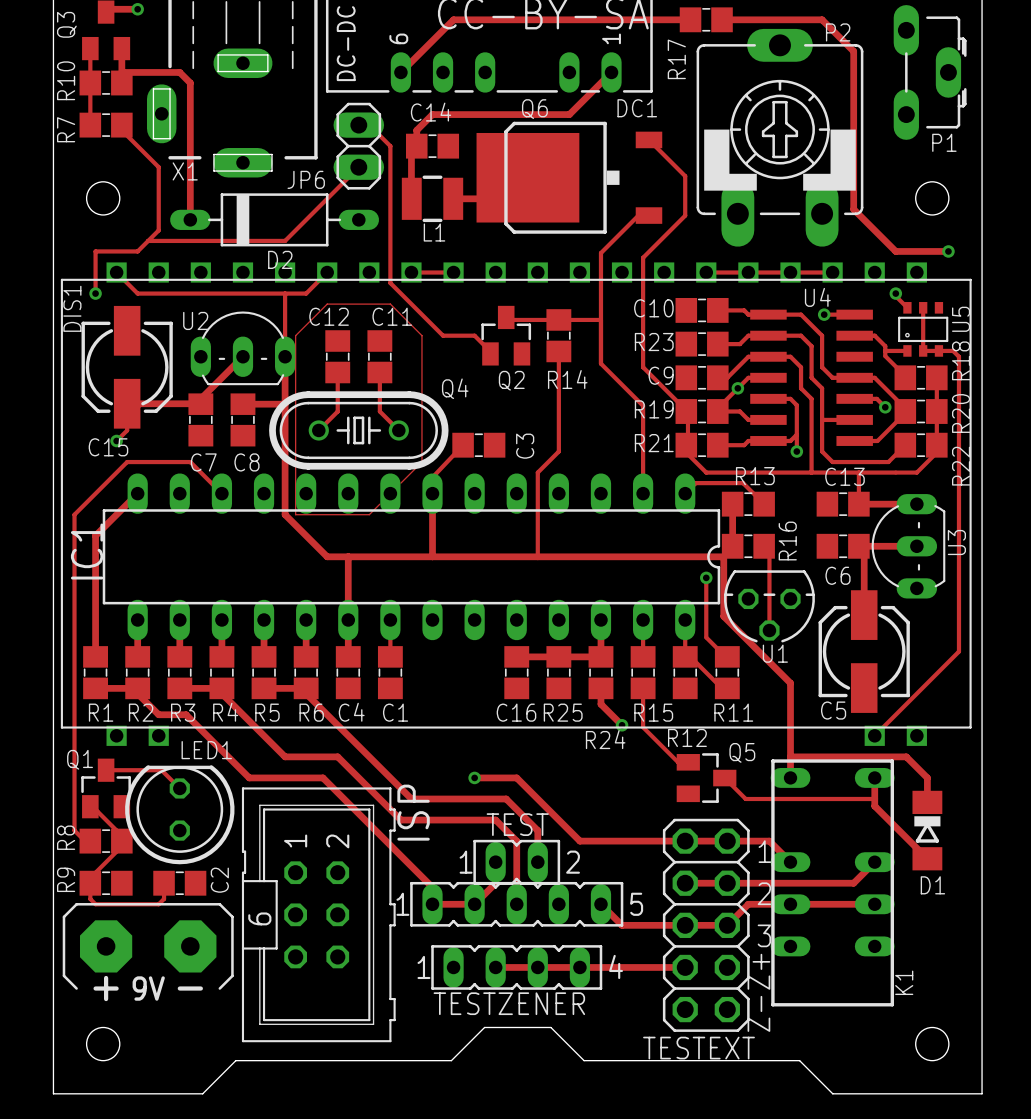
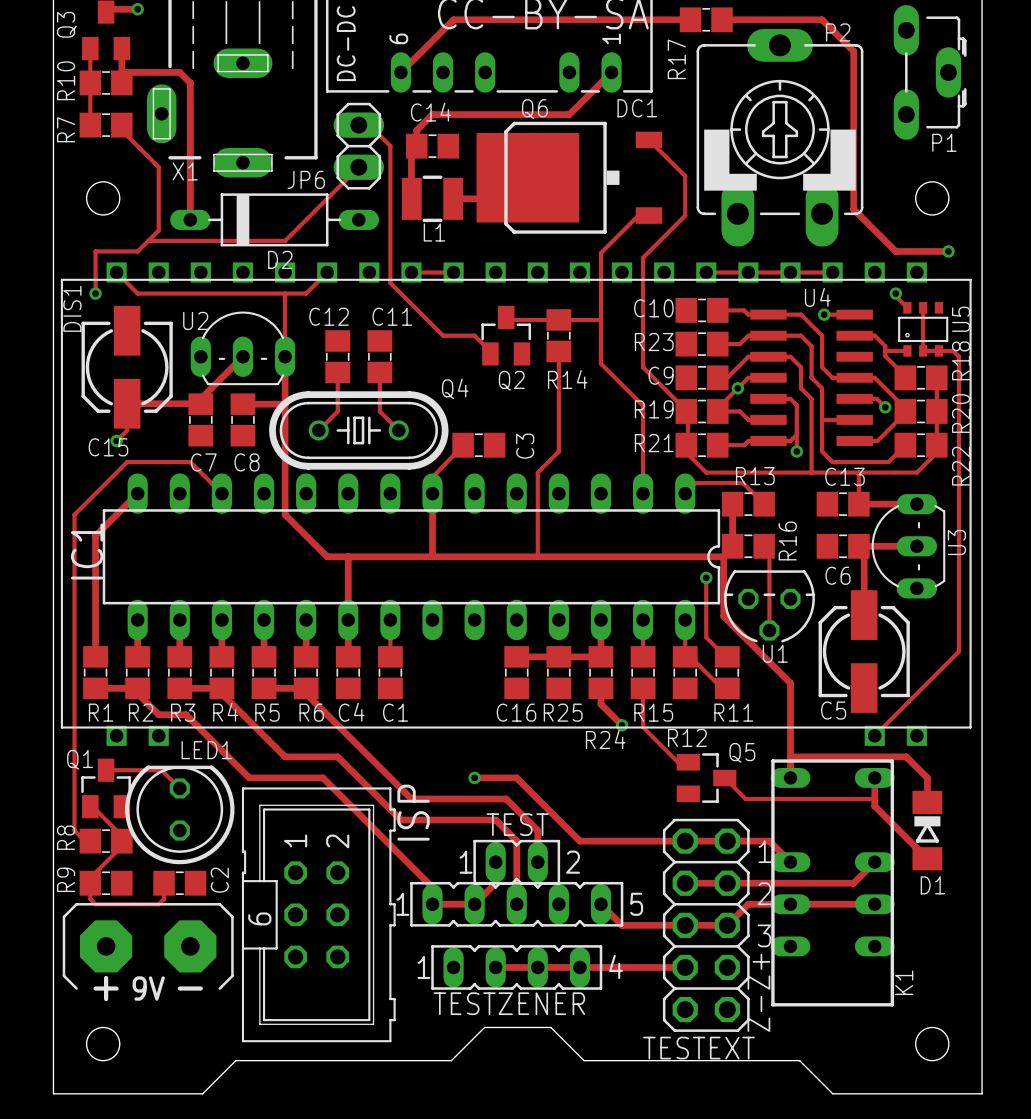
track: (400, 483) (421, 462) (421, 335) (390, 304) (327, 304) (295, 335) (295, 514) (369, 514) (379, 504) -> none

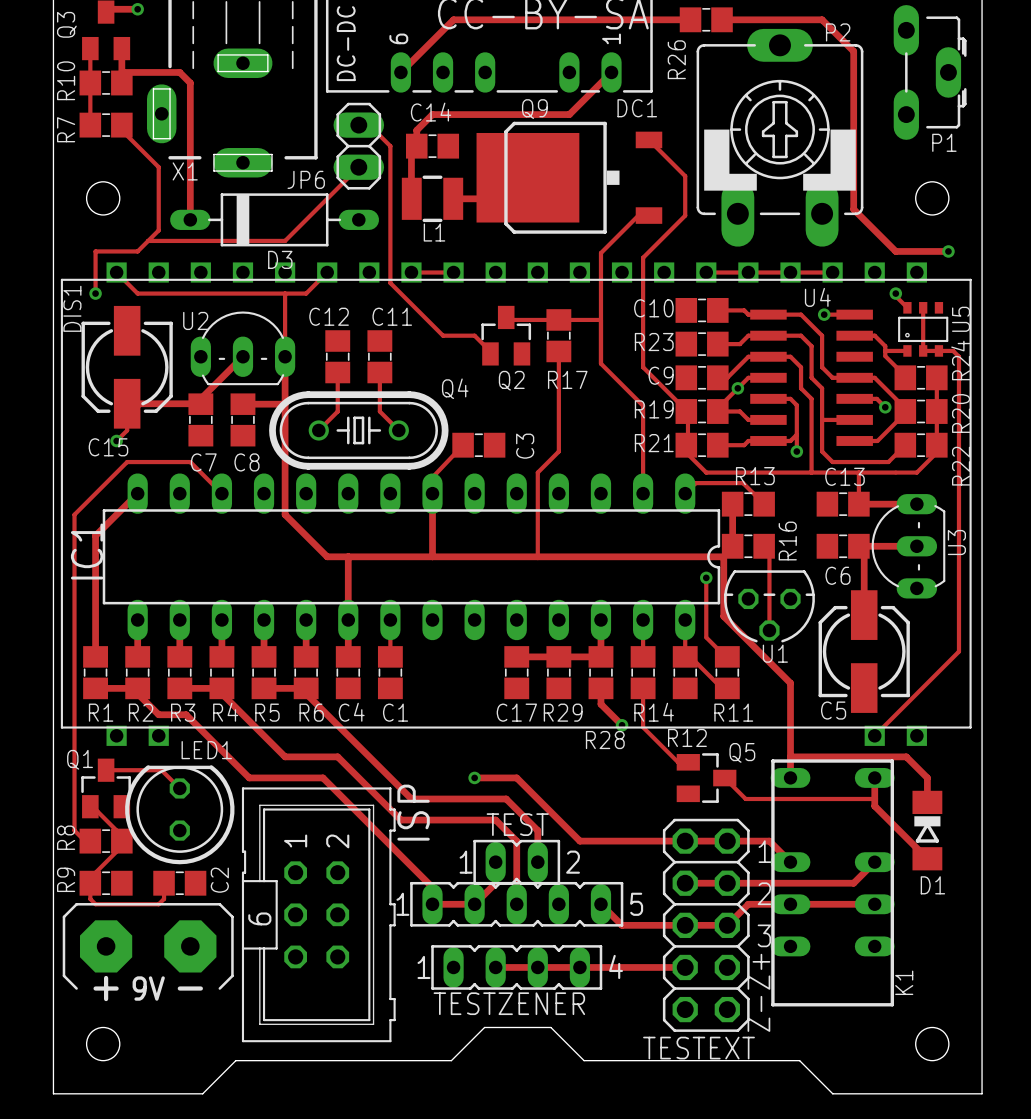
R17 name: R17 (676, 59) -> R26 (676, 59)
Q6 name: Q6 (534, 109) -> Q9 (534, 109)
D2 name: D2 (280, 259) -> D3 (280, 259)
R18 name: R18 (961, 360) -> R24 (960, 360)
R14 name: R14 (567, 379) -> R17 (567, 379)
C16 name: C16 (516, 712) -> C17 (516, 712)
R25 name: R25 (563, 712) -> R29 (563, 712)
R15 name: R15 (653, 712) -> R14 (654, 712)
R24 name: R24 (605, 739) -> R28 (605, 740)

